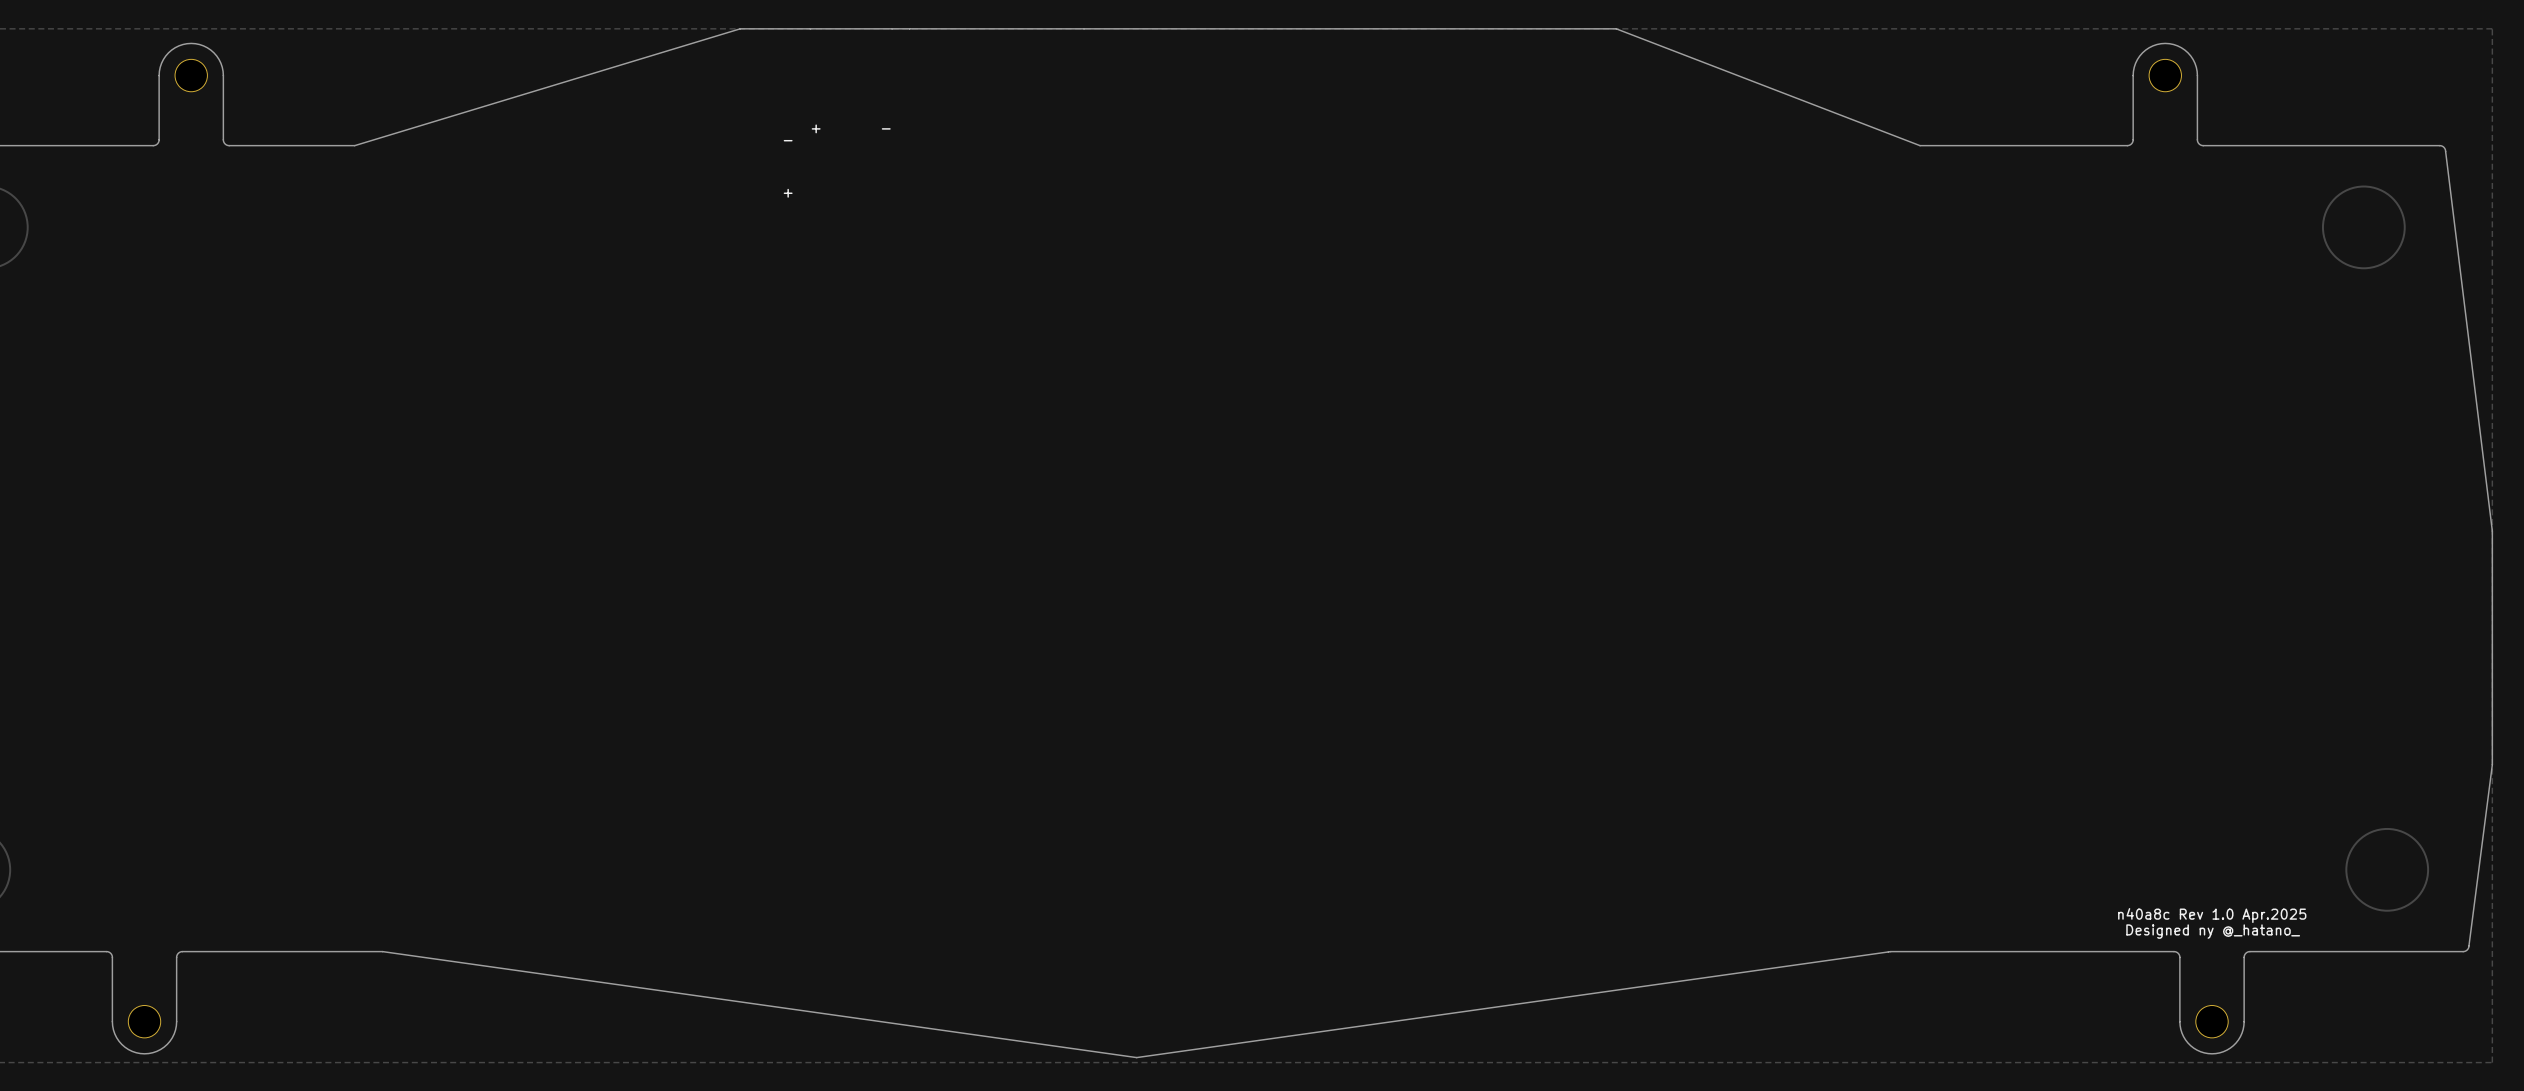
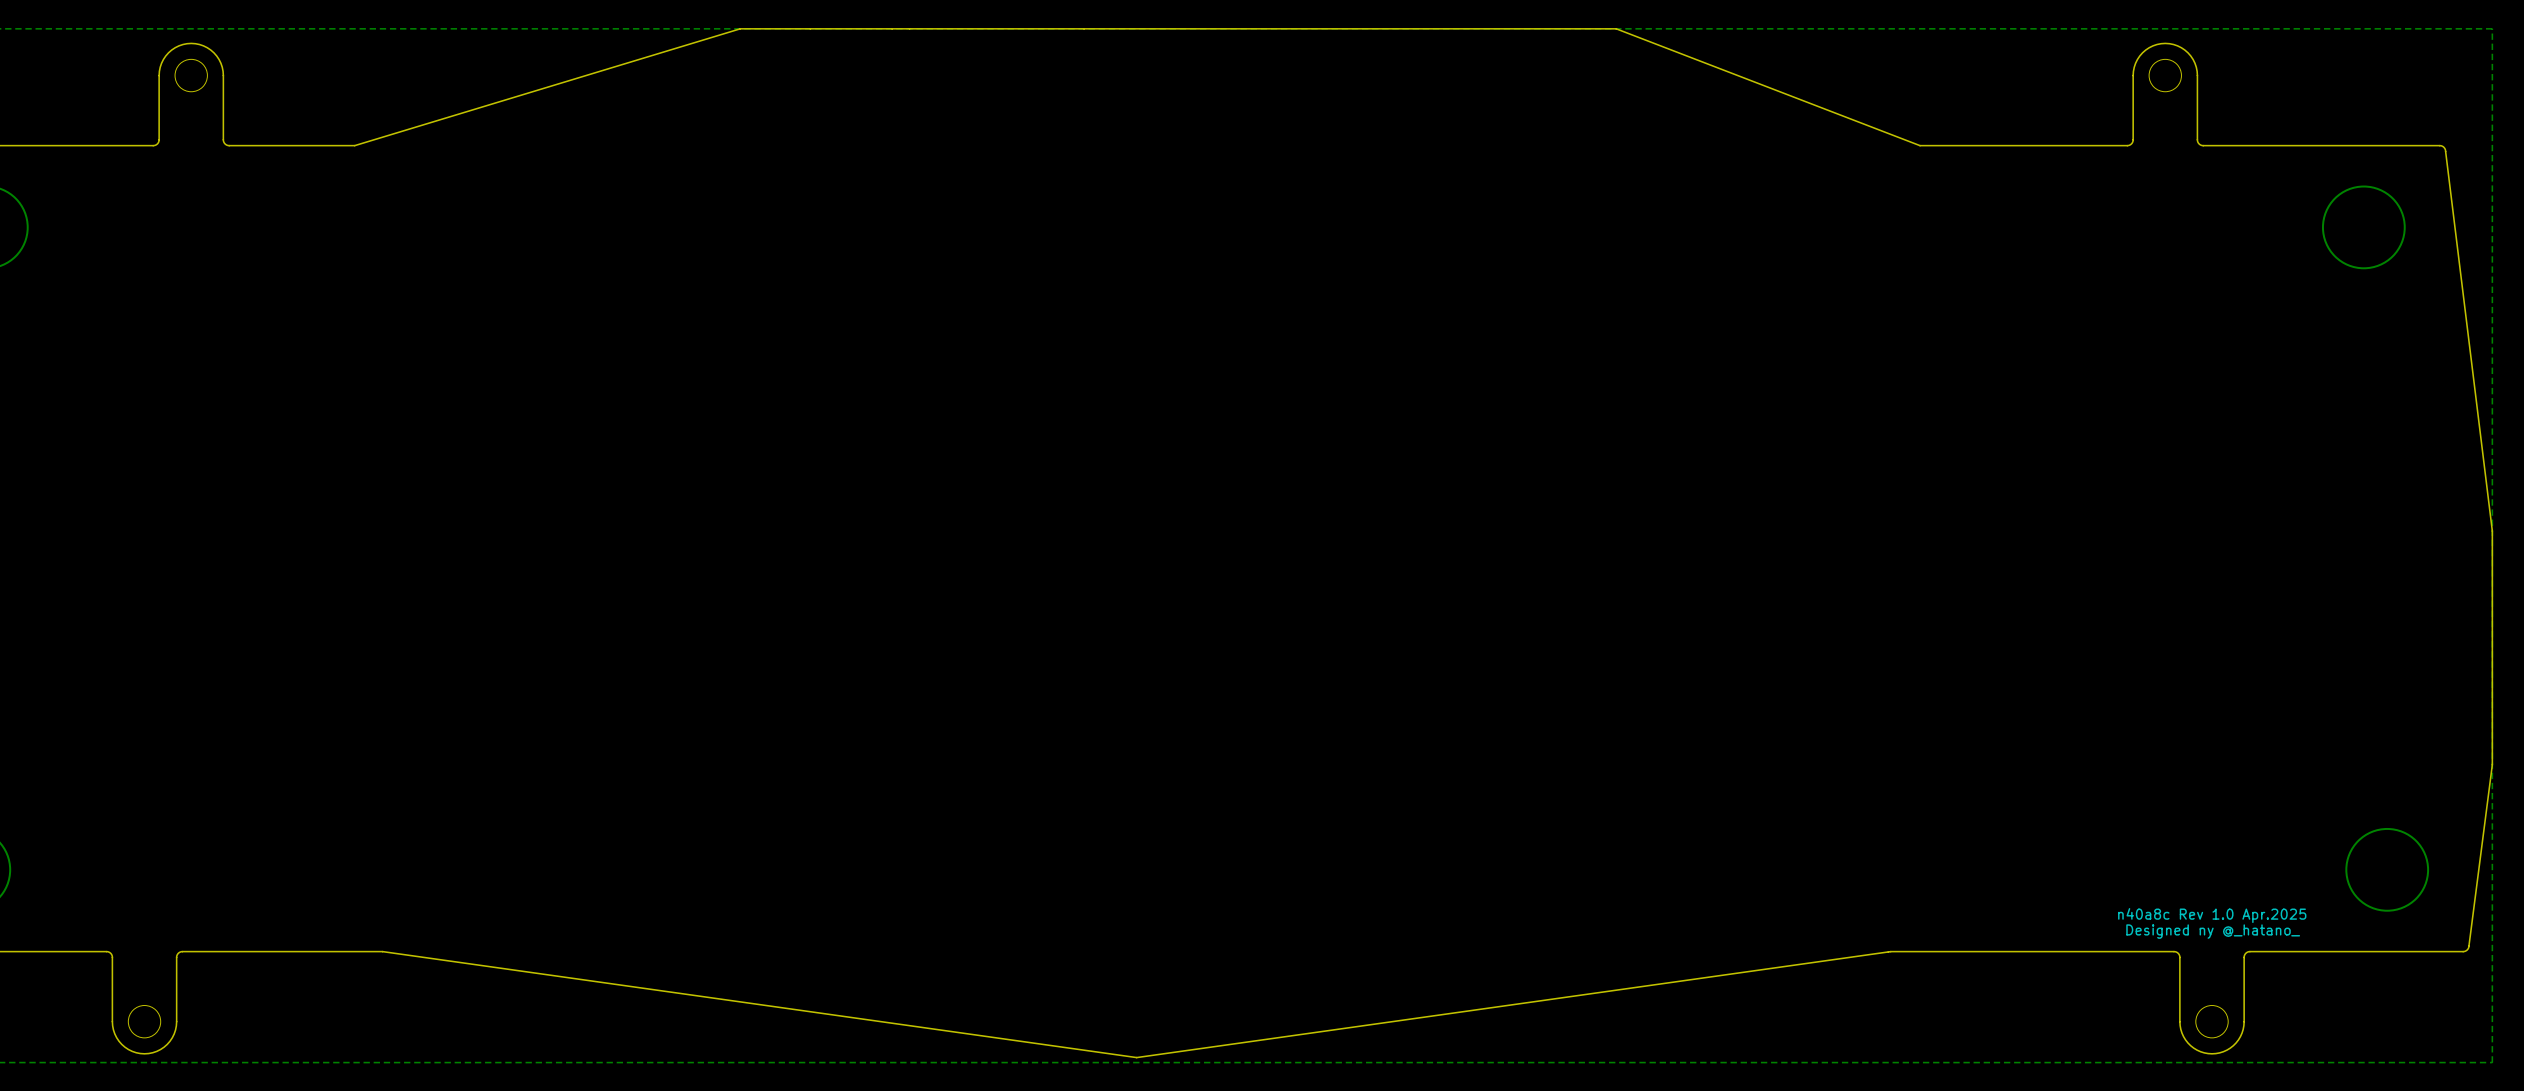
text: + (816, 128) -> none
text: - (886, 128) -> none
text: - (788, 140) -> none
text: + (788, 193) -> none

